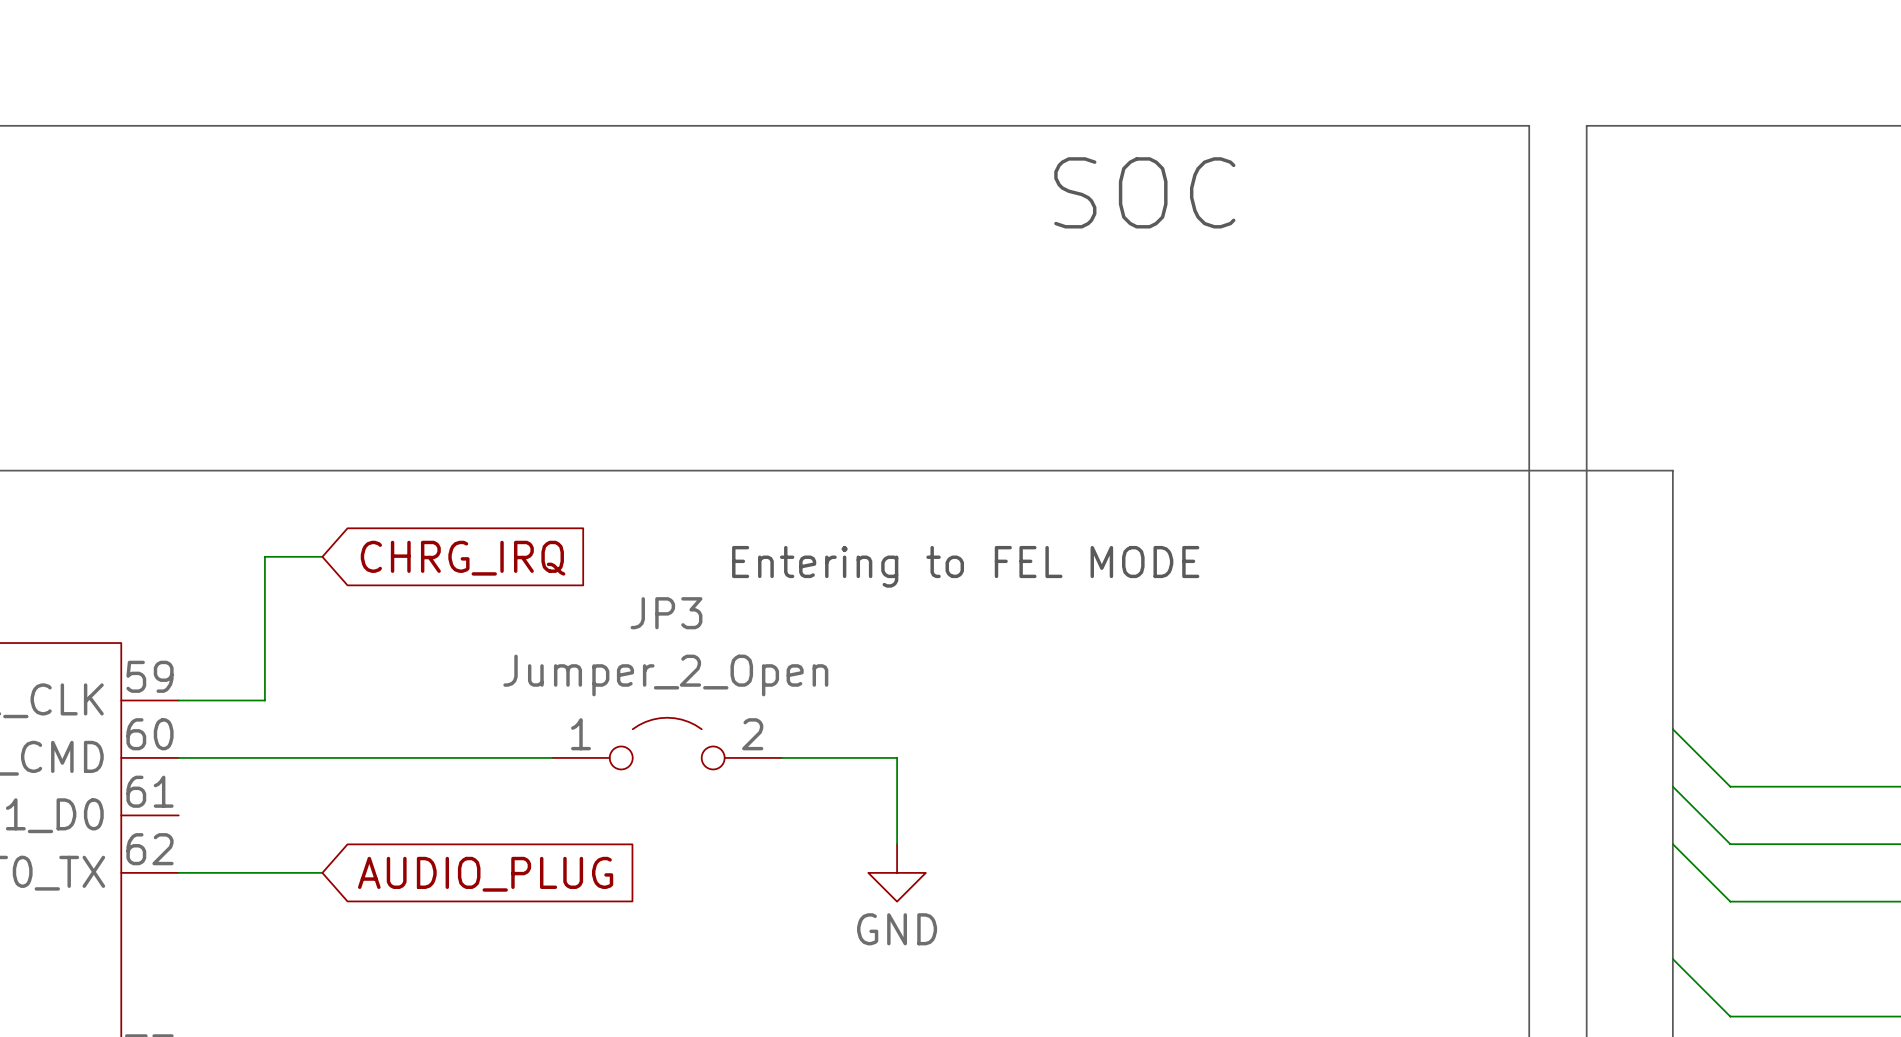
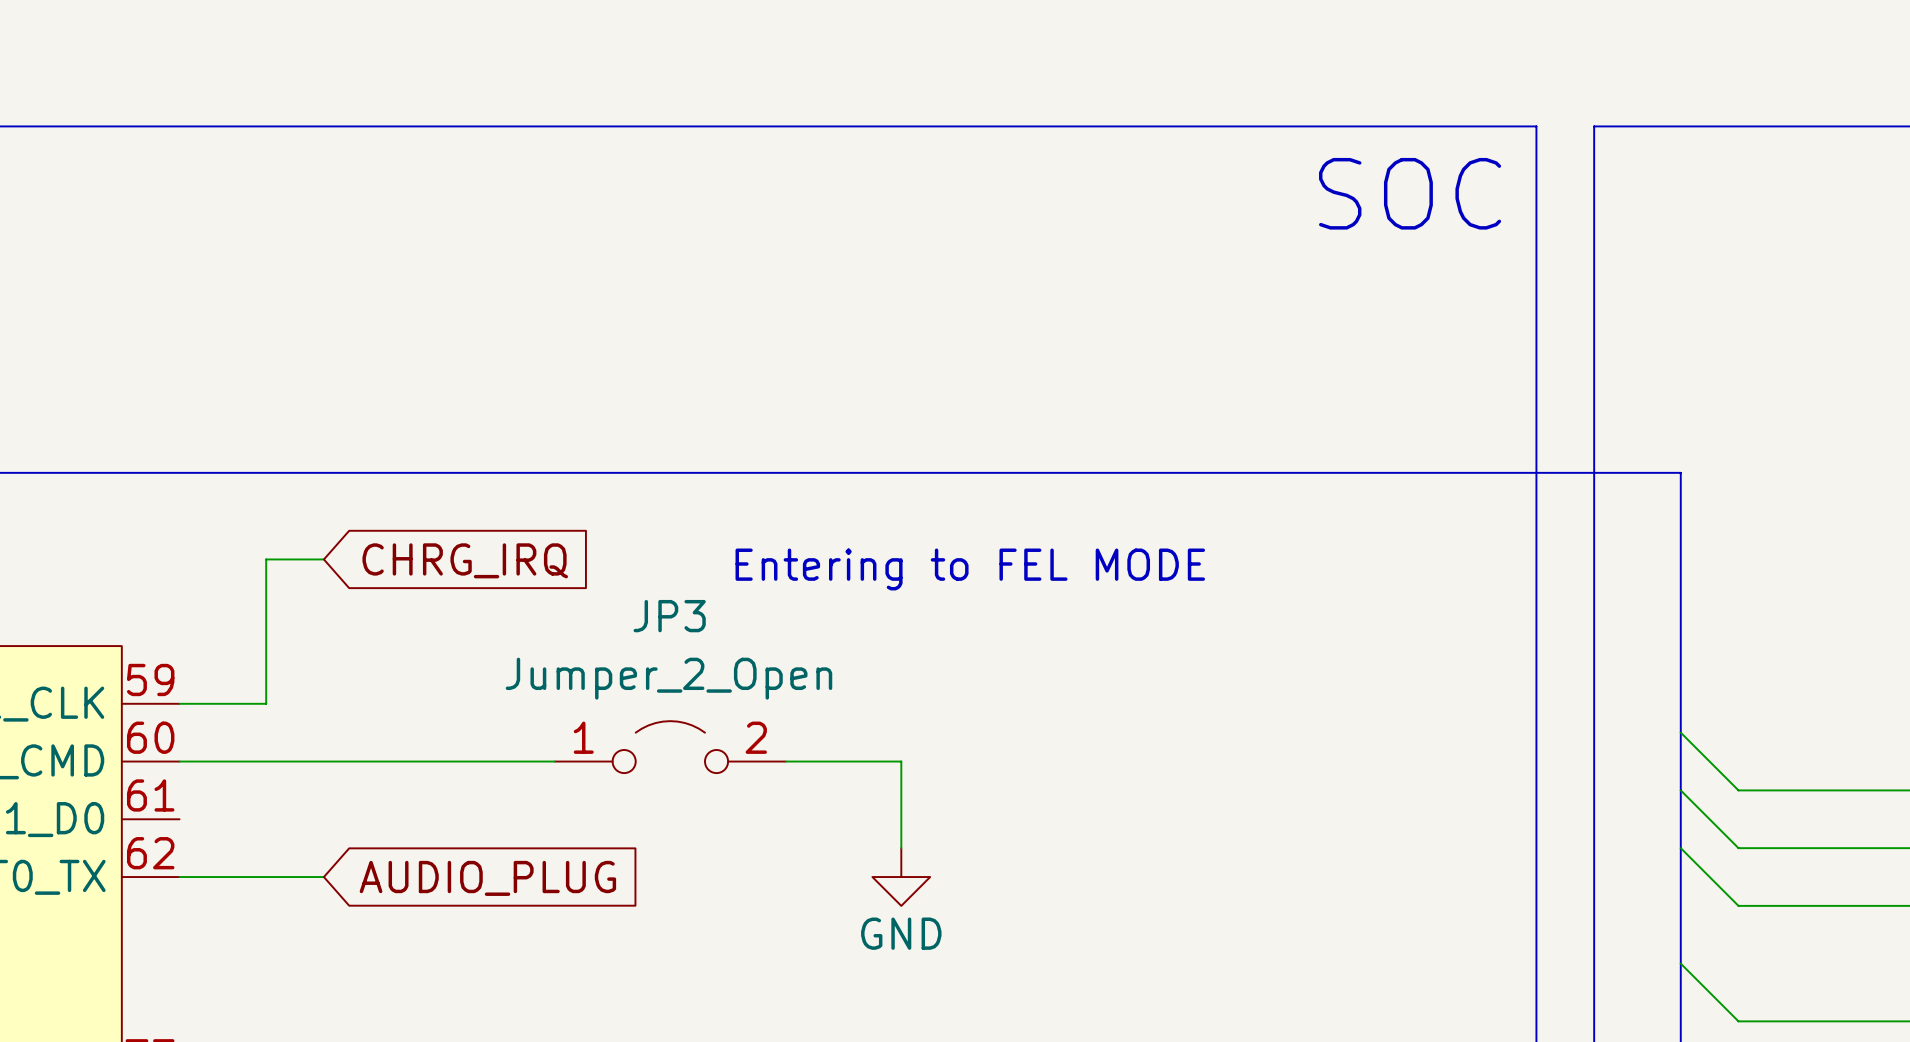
text position: SOC (1144, 192) -> SOC (1410, 193)

